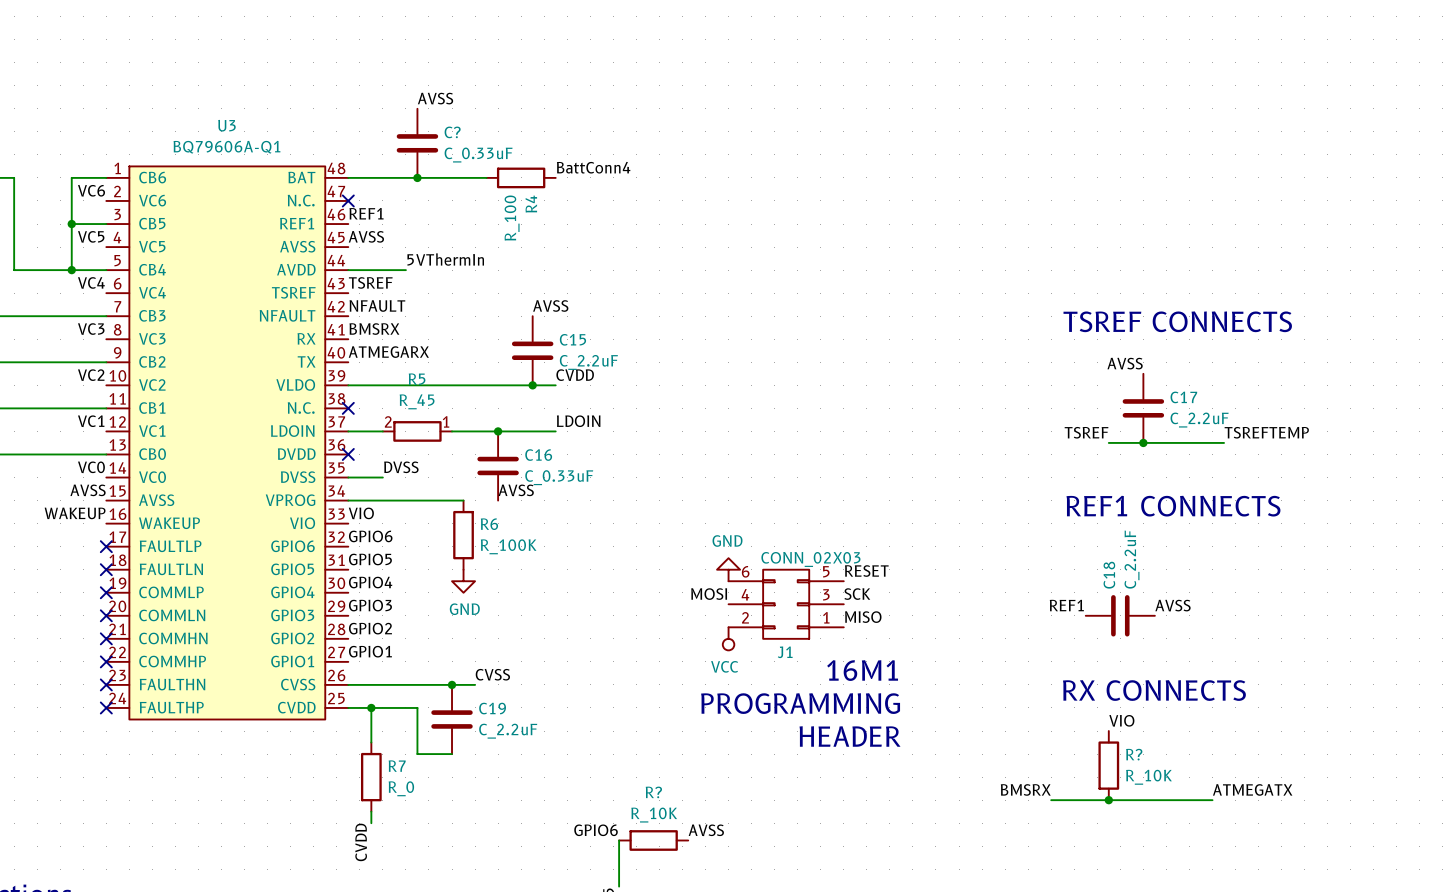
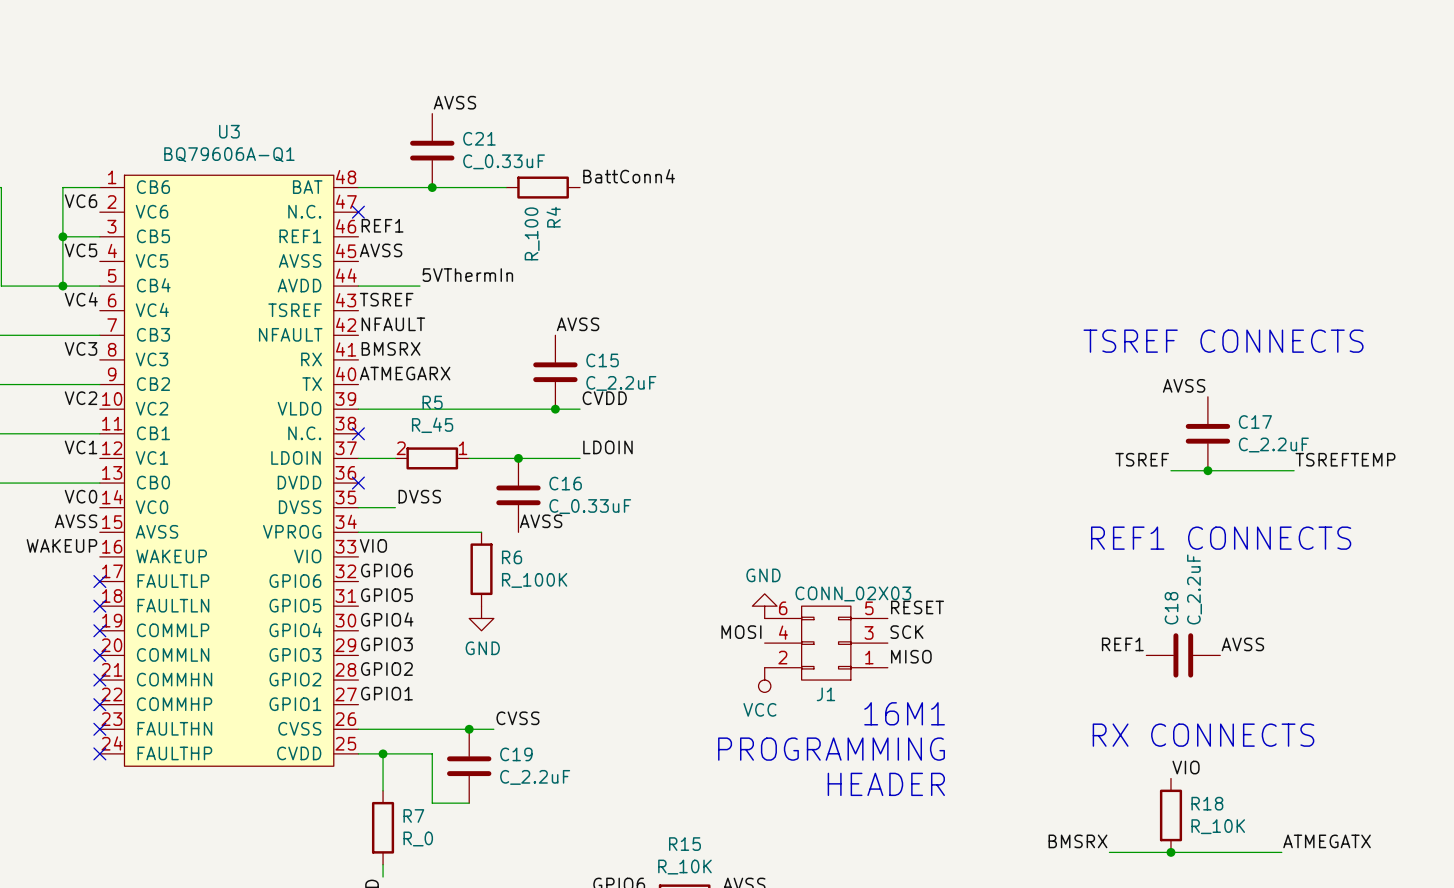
C? name: C? (452, 132) -> C21 (479, 138)
R? name: R? (1134, 754) -> R18 (1207, 803)
R? name: R? (653, 792) -> R15 (684, 844)

